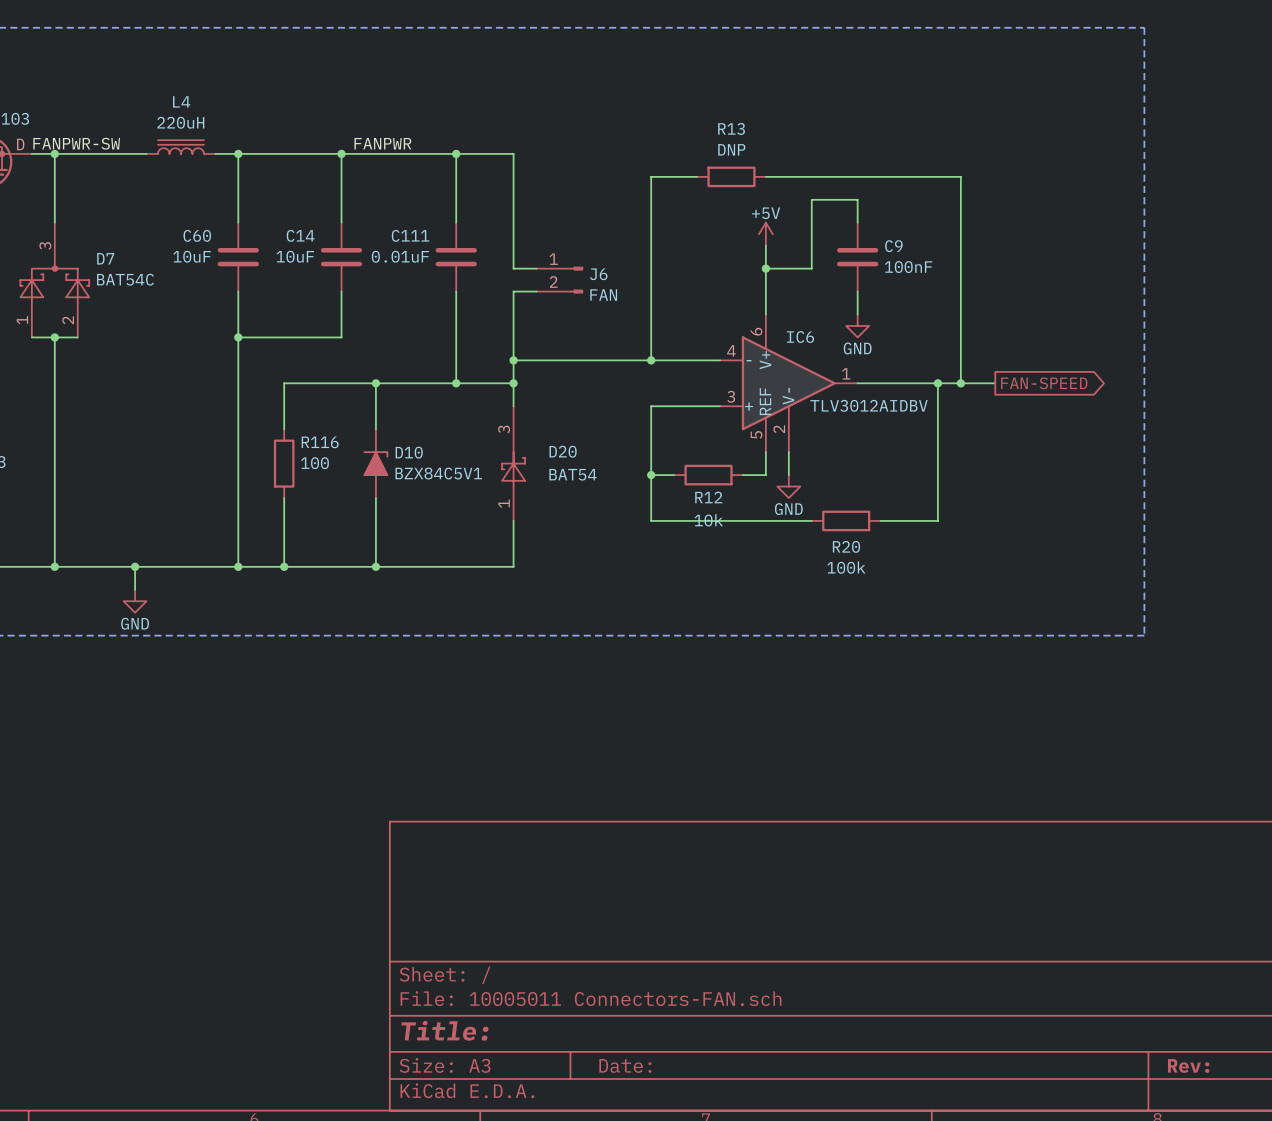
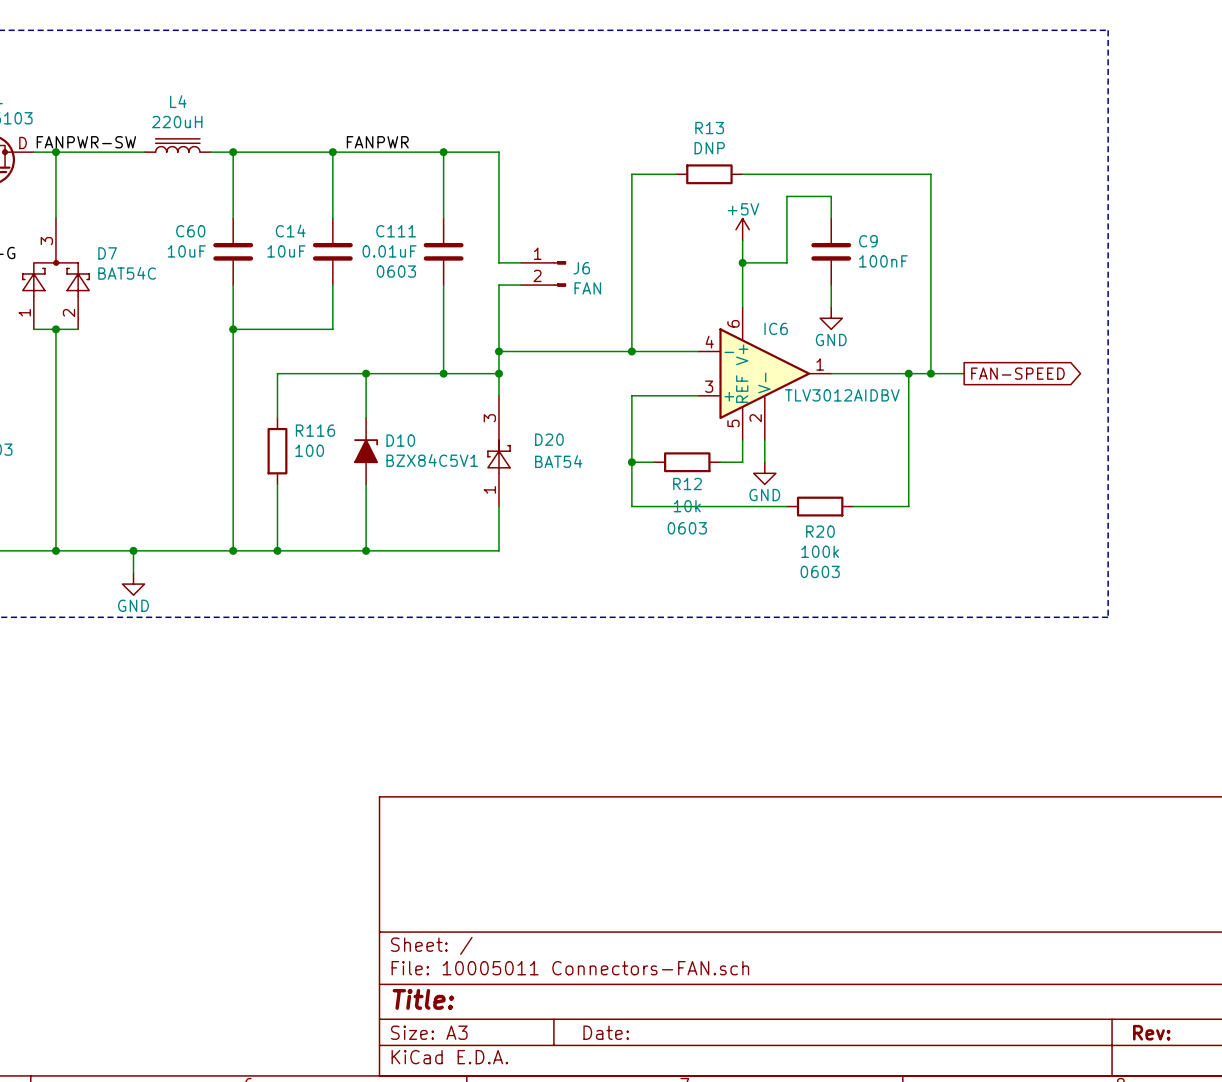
C111 text: none -> 0603 (396, 271)
R12 text: none -> 0603 (687, 528)
R20 text: none -> 0603 (820, 571)

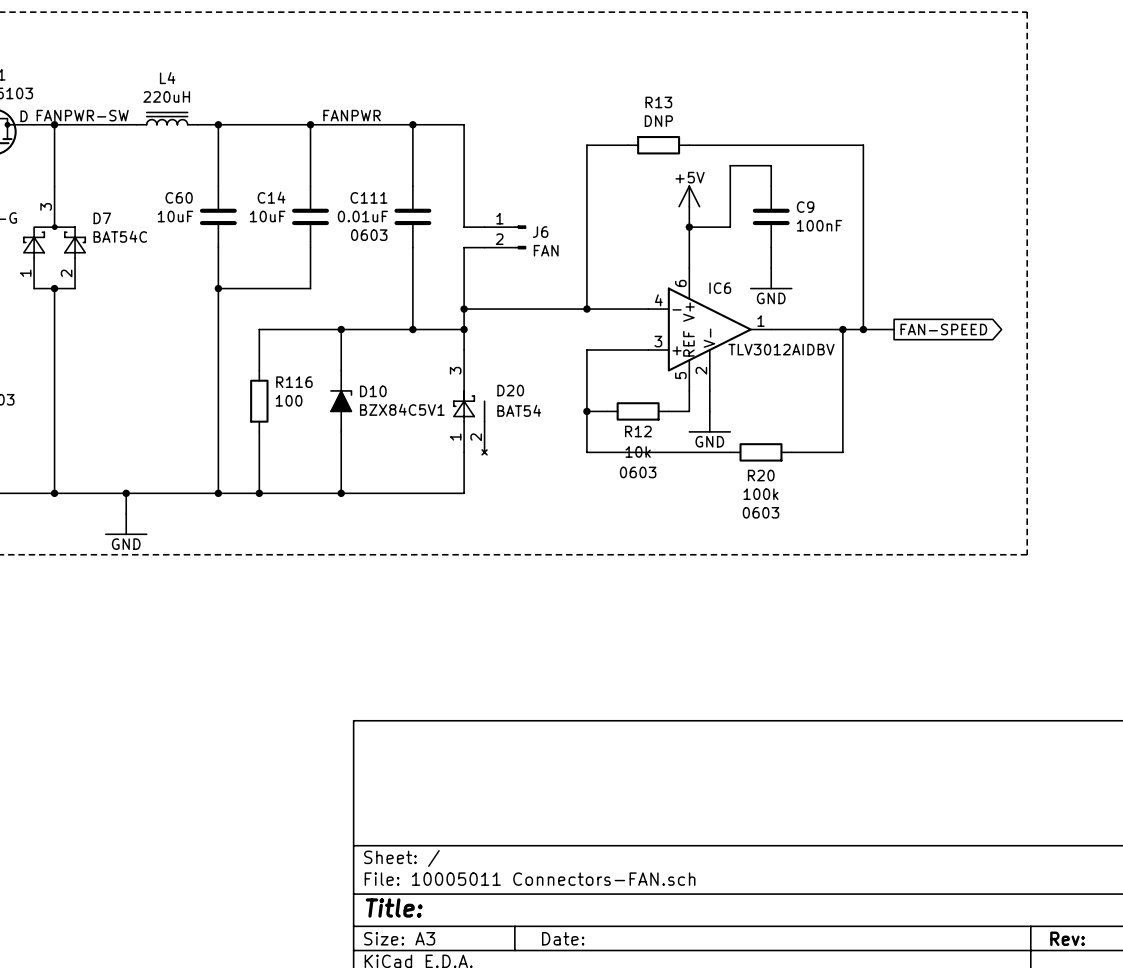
power symbol shape: [736, 218, 750, 241] -> [679, 186, 700, 207]
power symbol shape: [820, 307, 843, 330] -> [750, 268, 792, 289]
D20 symbol: [487, 395, 511, 507] -> [453, 350, 487, 455]
power symbol shape: [753, 462, 776, 485] -> [689, 411, 731, 432]
power symbol shape: [122, 573, 145, 596] -> [105, 513, 147, 535]

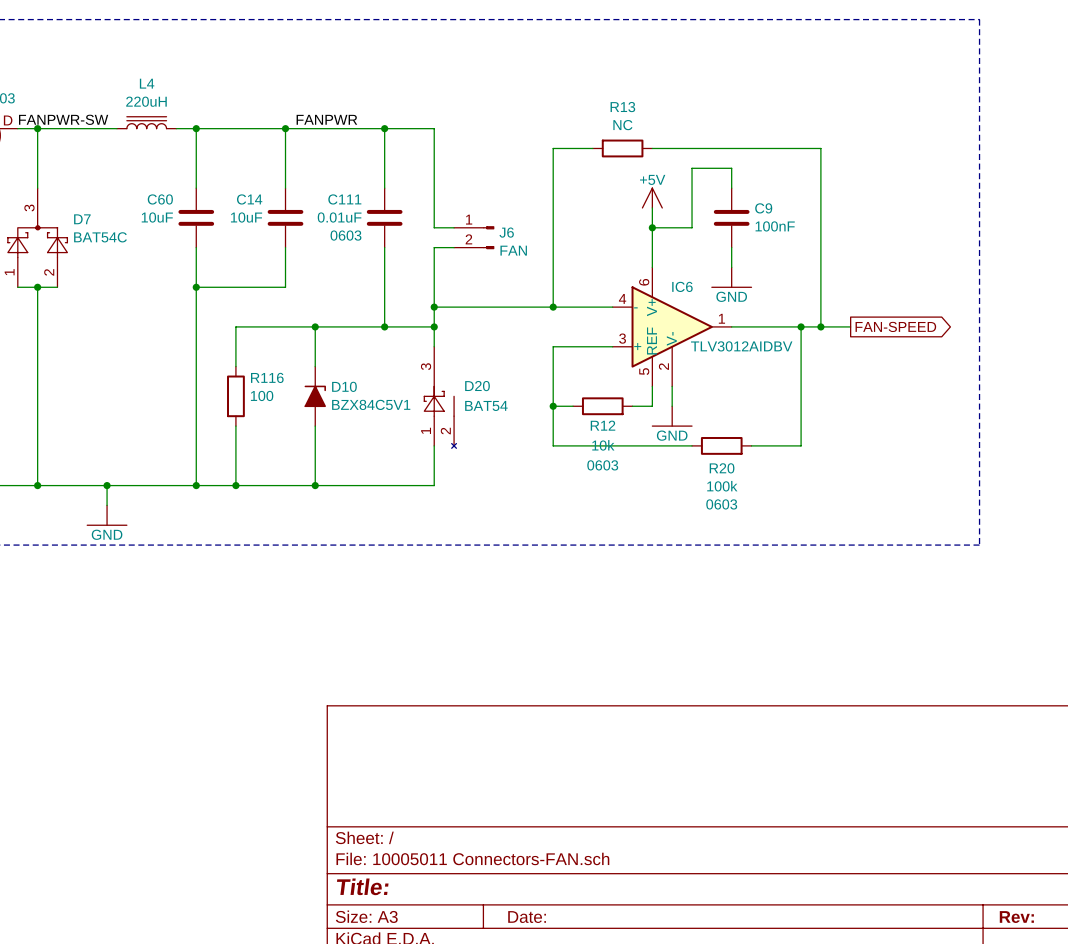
R13 value: DNP (658, 121) -> NC (622, 125)

